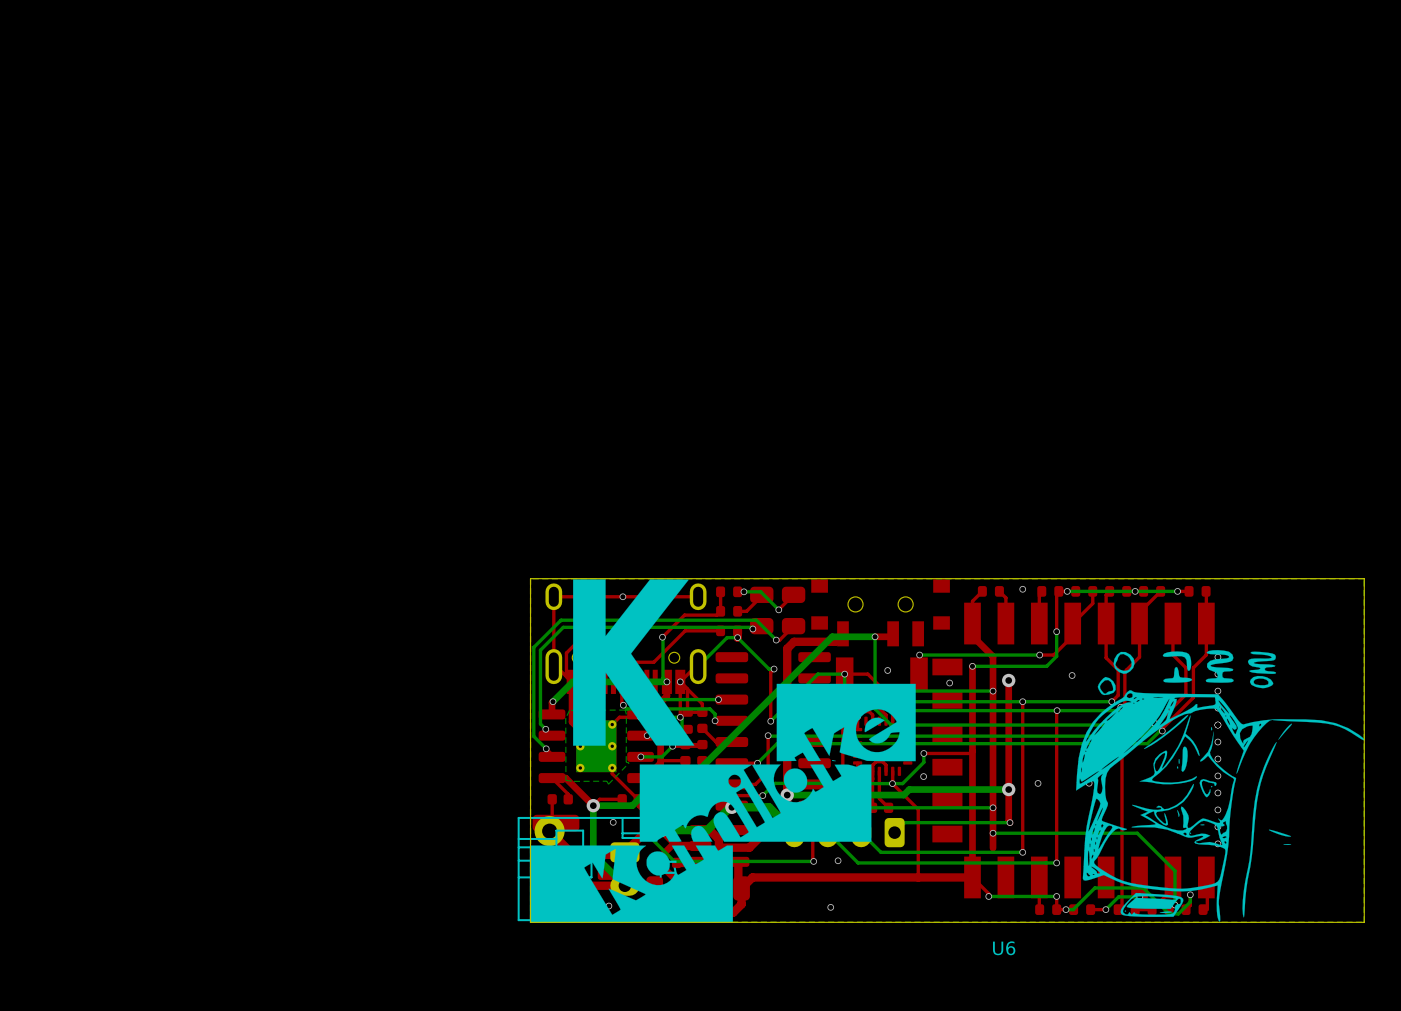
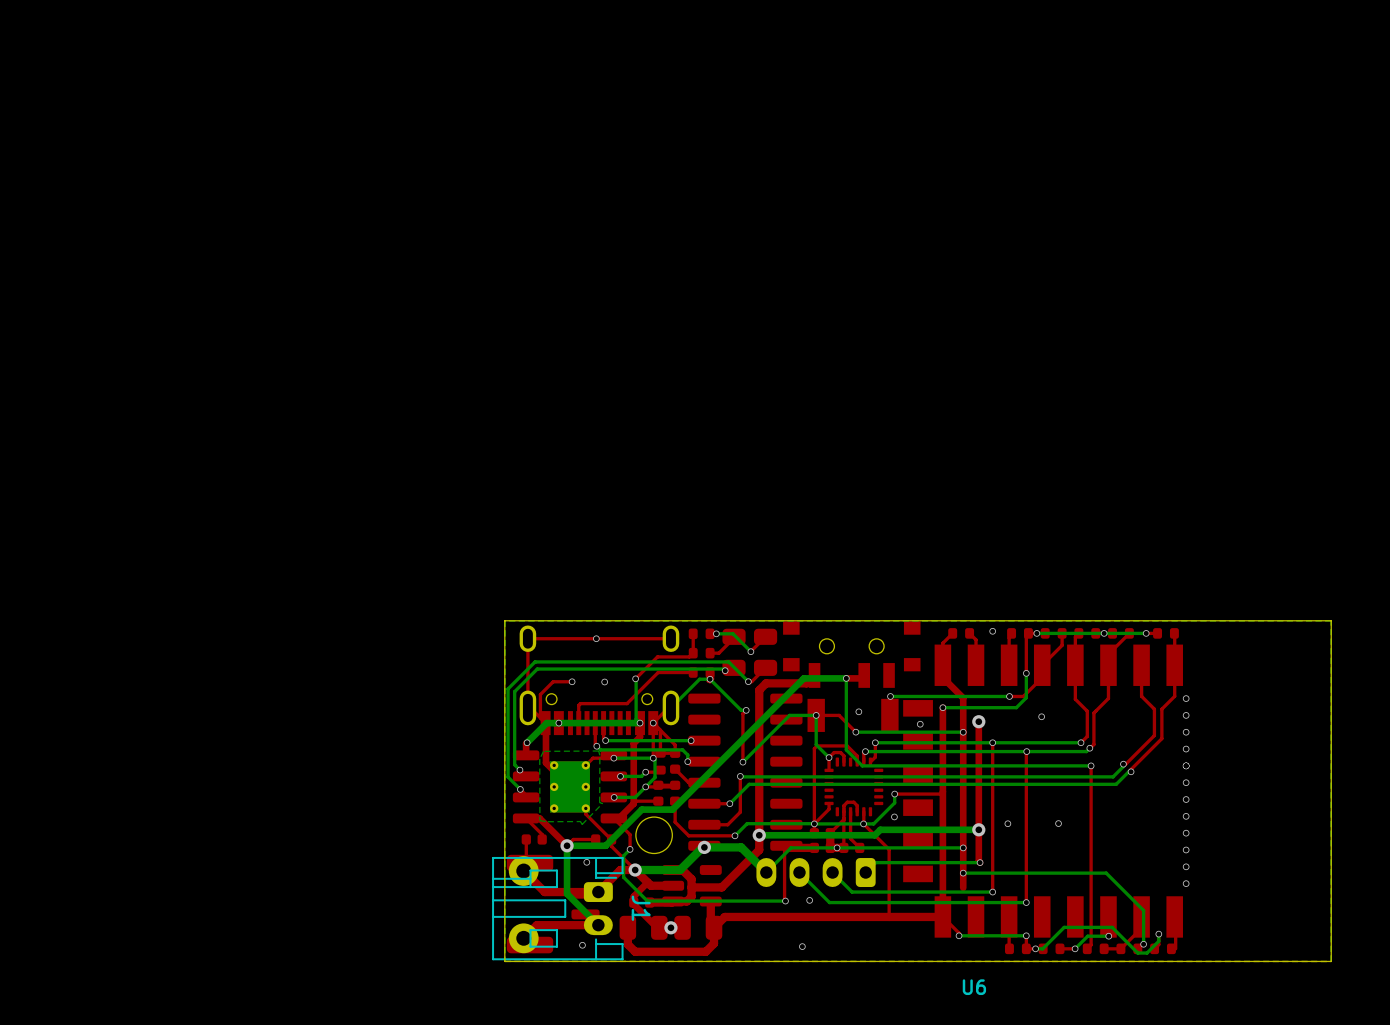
drawing: [529, 579, 916, 923] -> none
drawing: [1076, 650, 1366, 922] -> none

